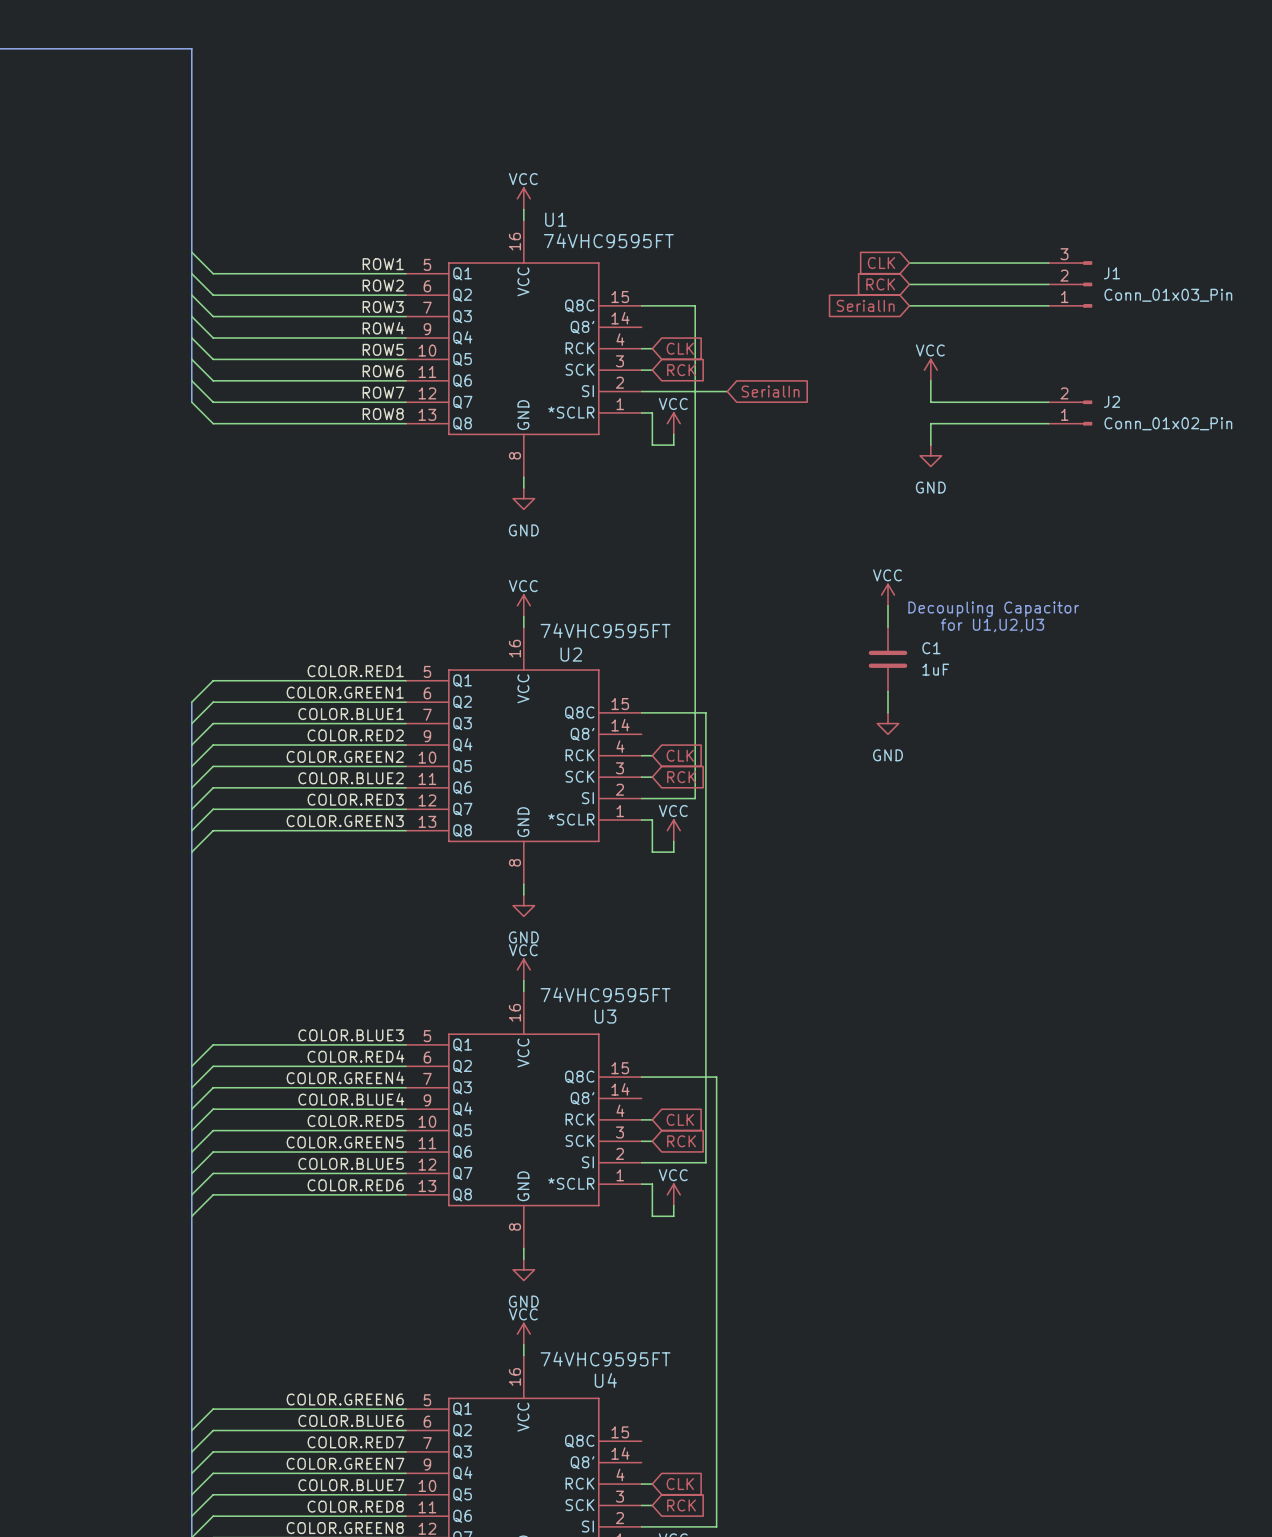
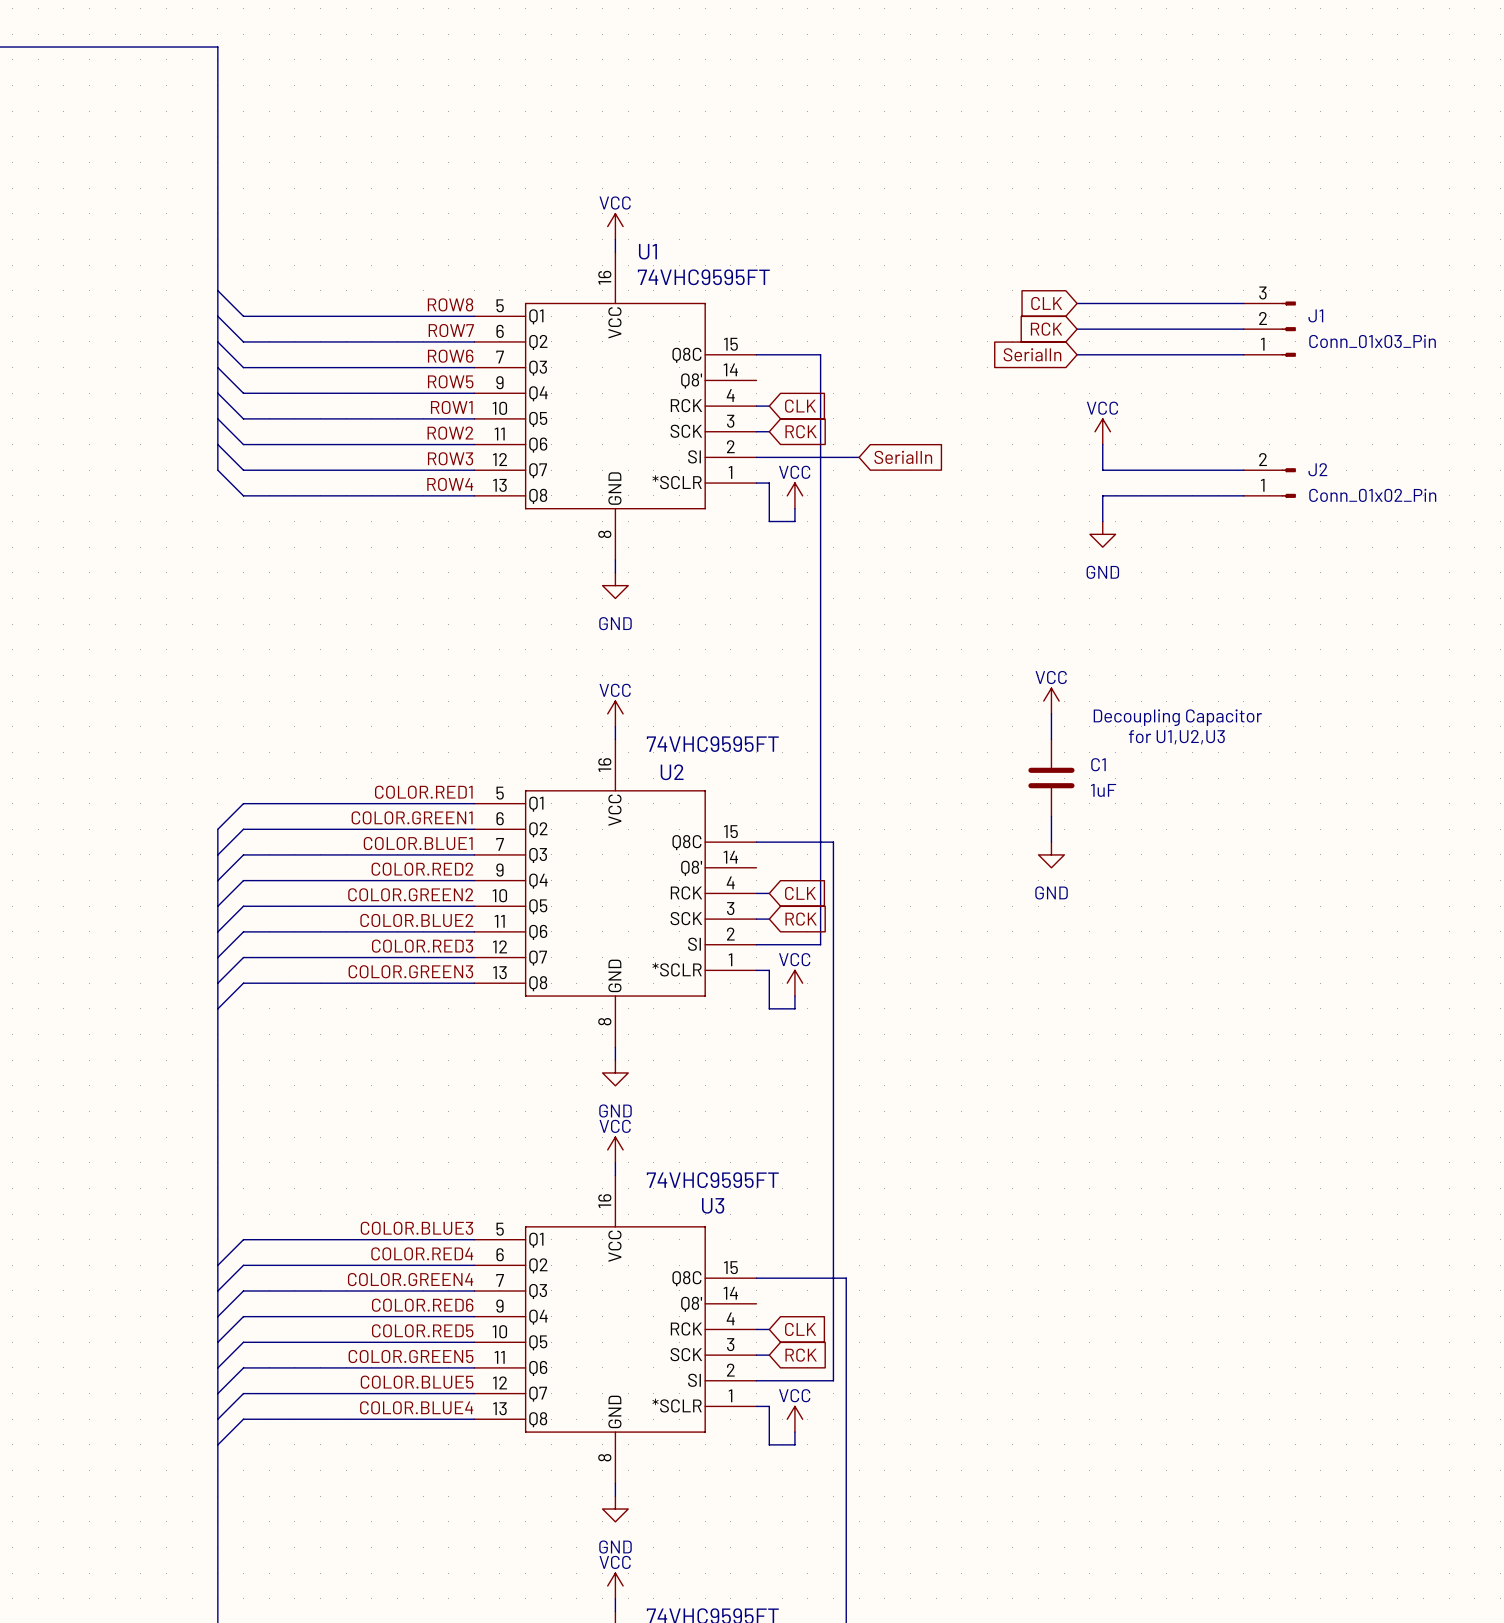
label: ROW1 (383, 264) -> ROW8 (450, 304)
label: ROW2 (383, 285) -> ROW7 (451, 330)
label: ROW3 (383, 307) -> ROW6 (450, 356)
label: ROW4 (383, 328) -> ROW5 (450, 381)
label: ROW5 (383, 349) -> ROW1 (451, 407)
label: ROW6 (383, 371) -> ROW2 (450, 433)
label: ROW7 (383, 392) -> ROW3 (450, 458)
label: ROW8 (383, 414) -> ROW4 (450, 484)
label: COLOR.BLUE4 (351, 1099) -> COLOR.RED6 (422, 1305)
label: COLOR.RED6 (355, 1185) -> COLOR.BLUE4 (416, 1407)

